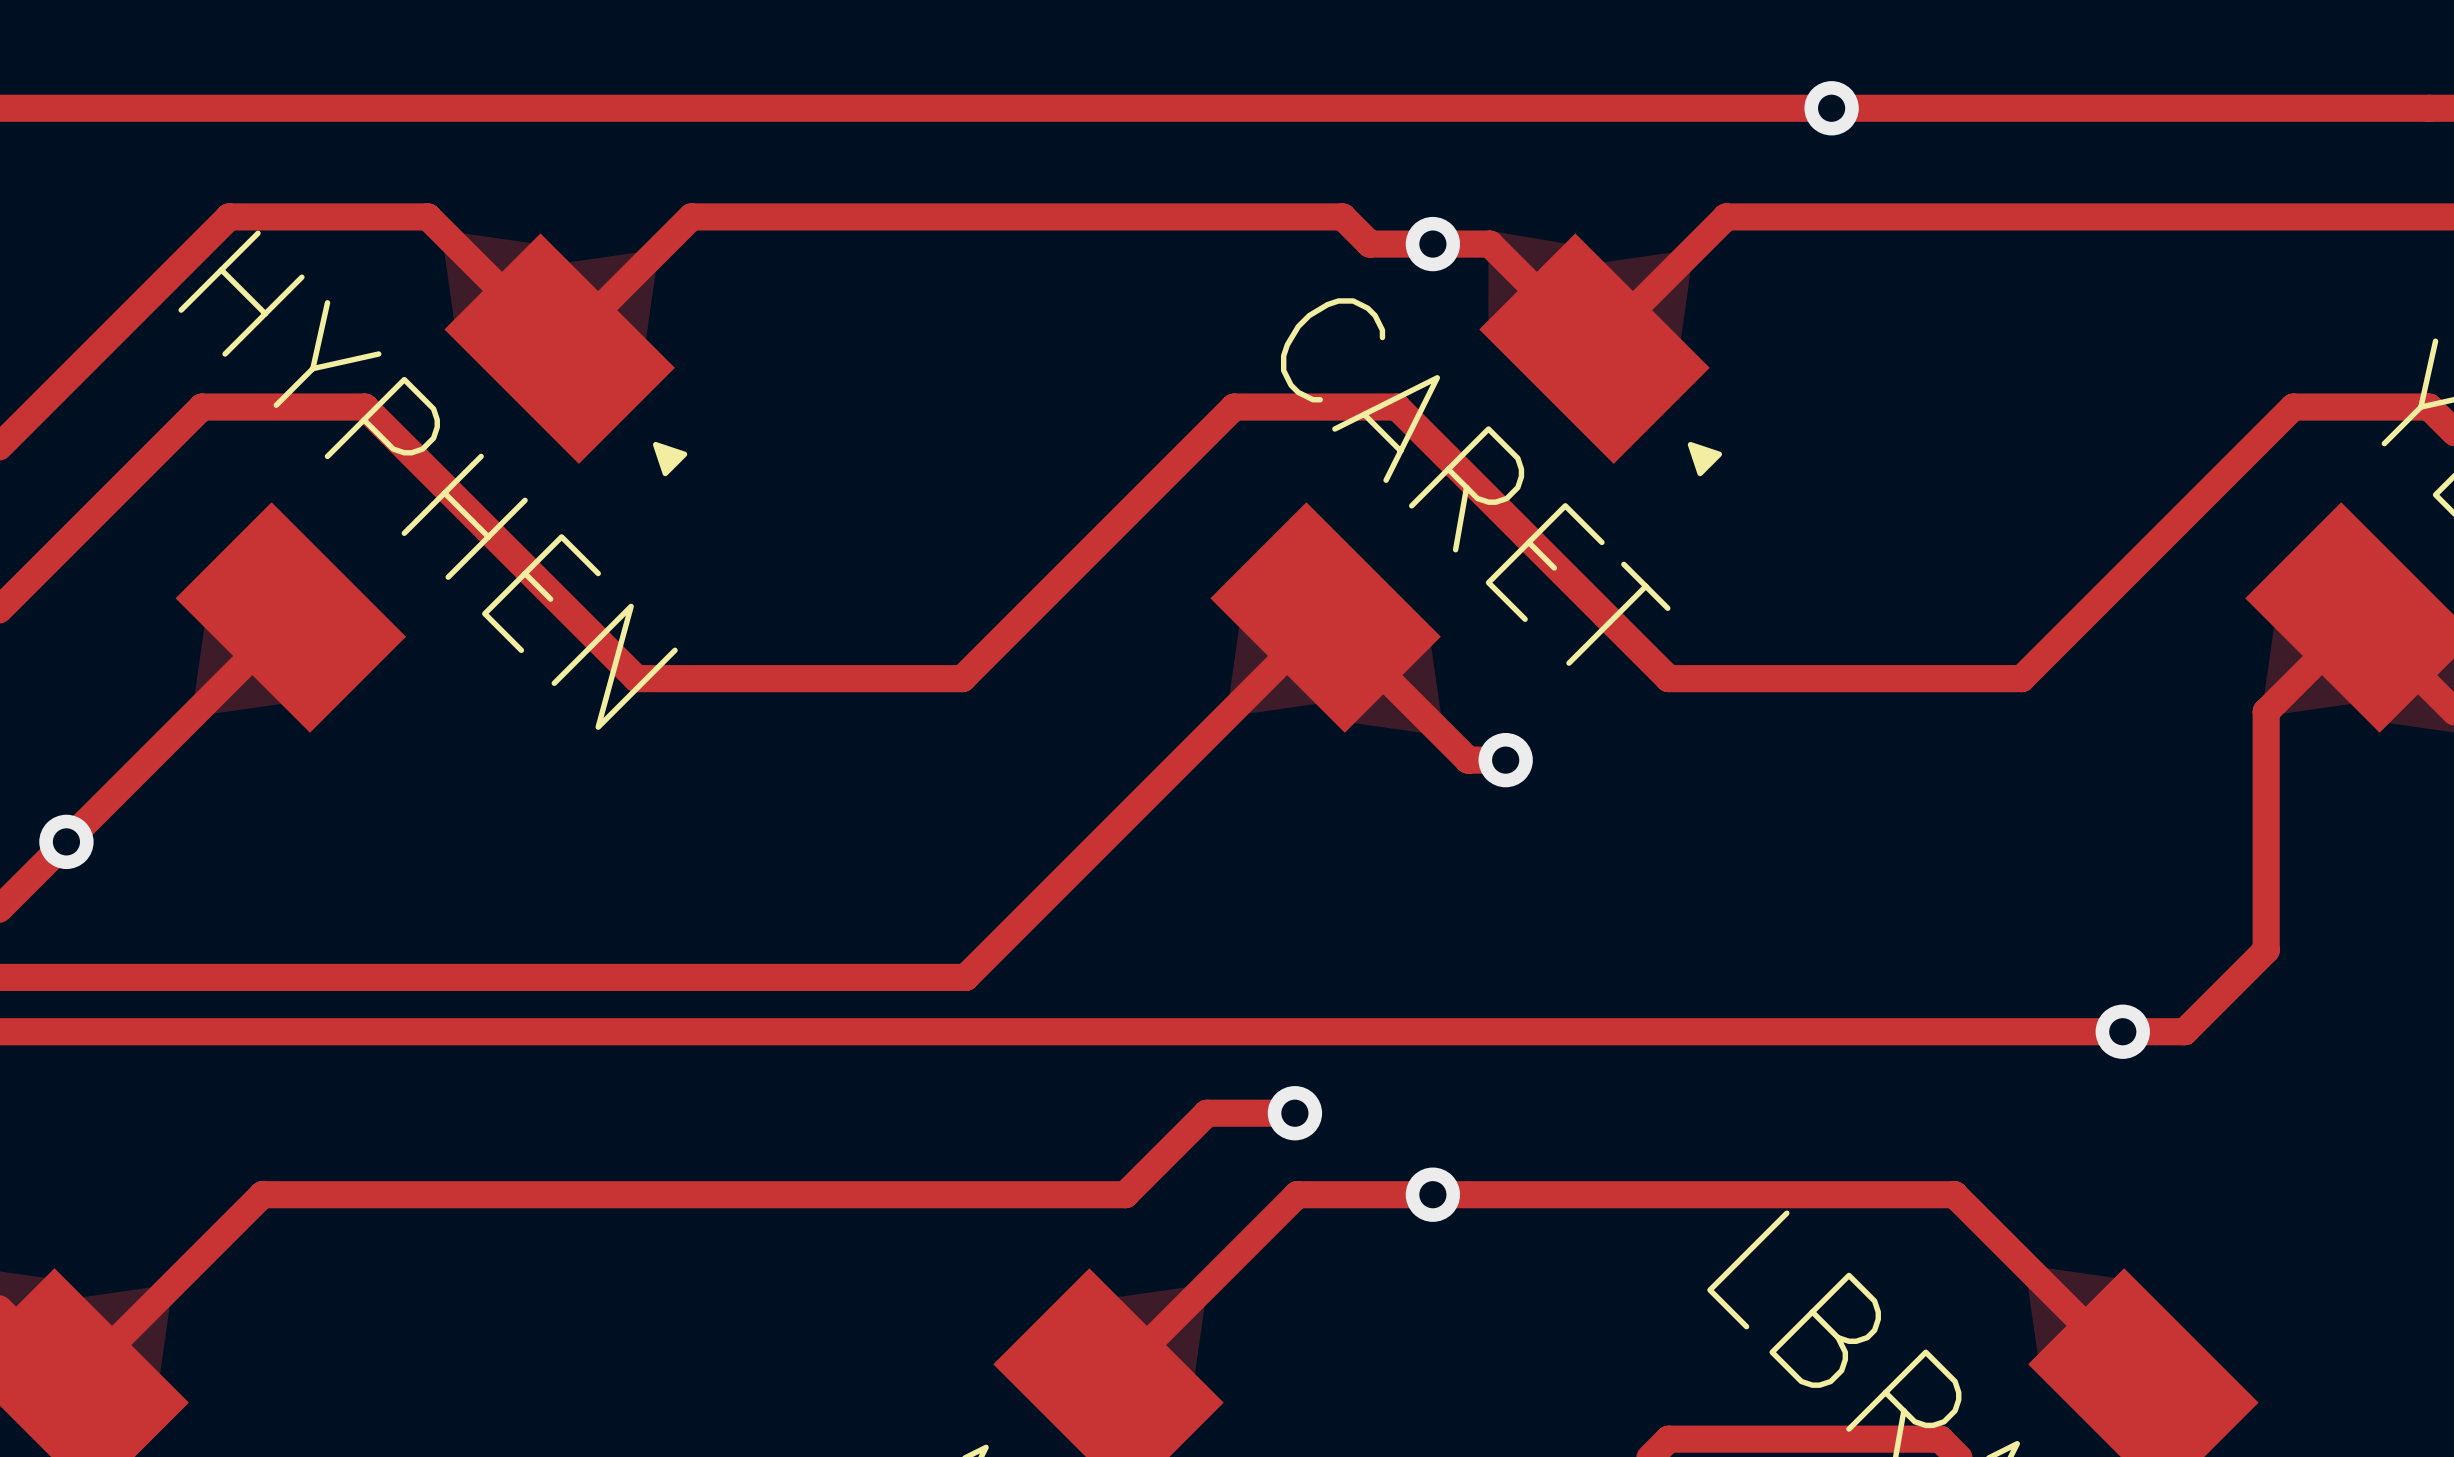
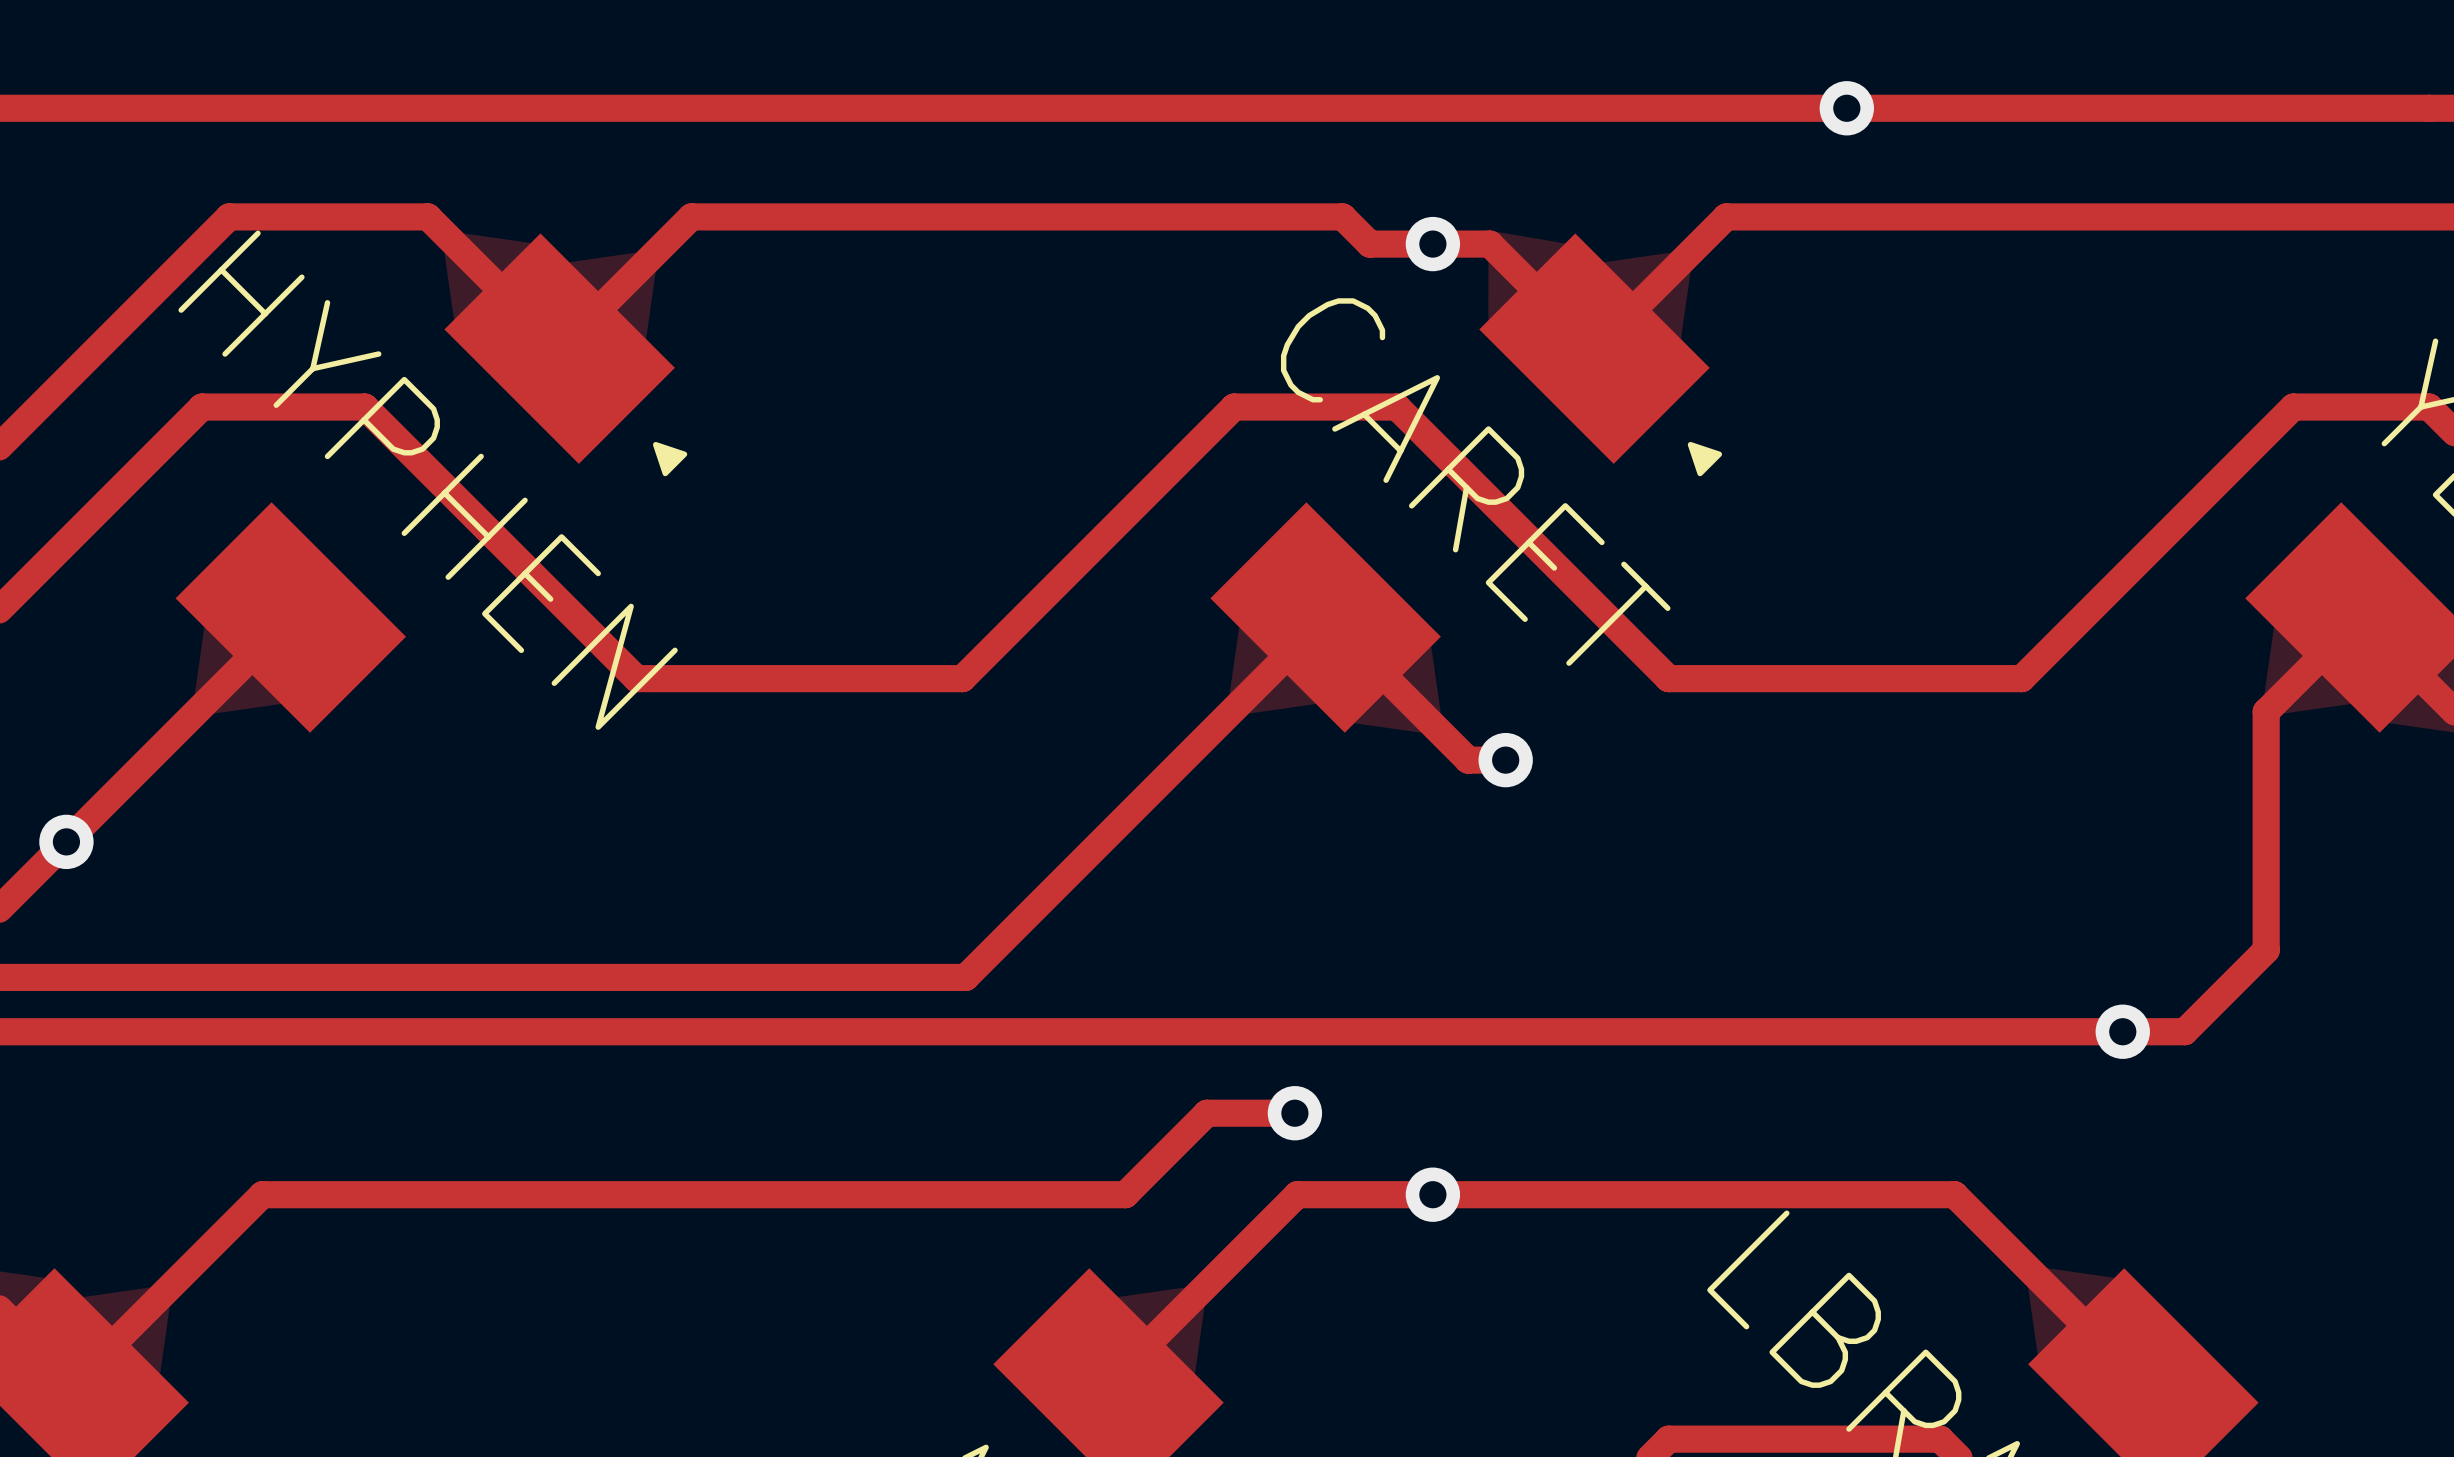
via position: (1831, 108) -> (1846, 108)

